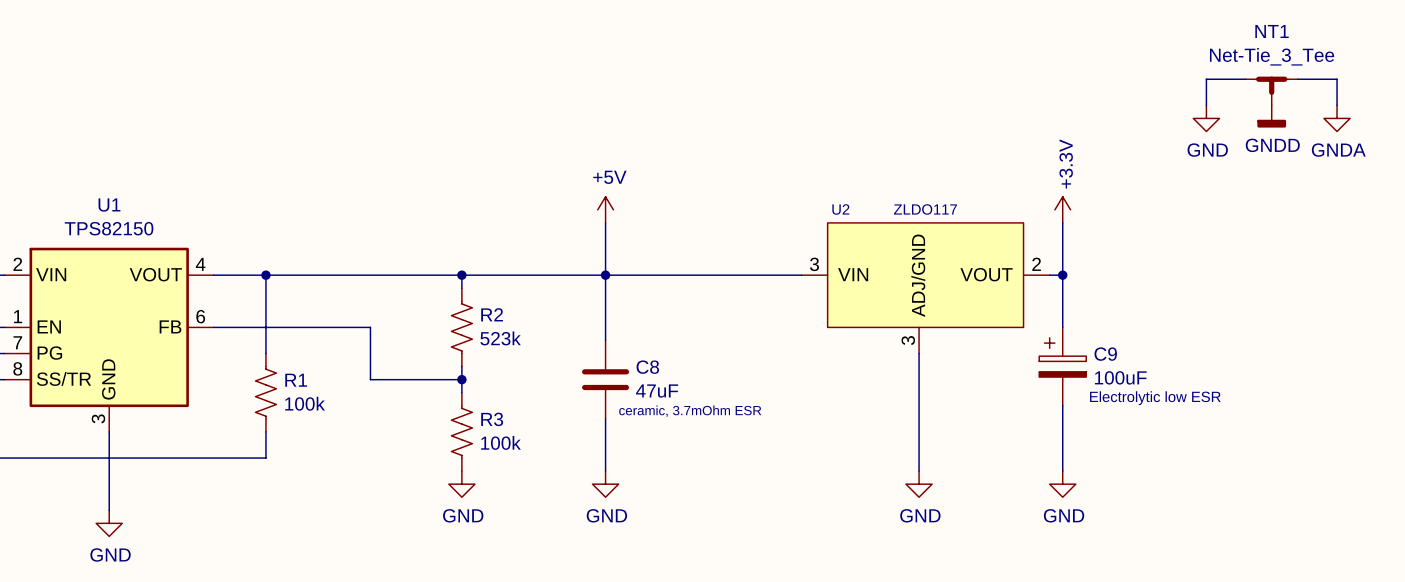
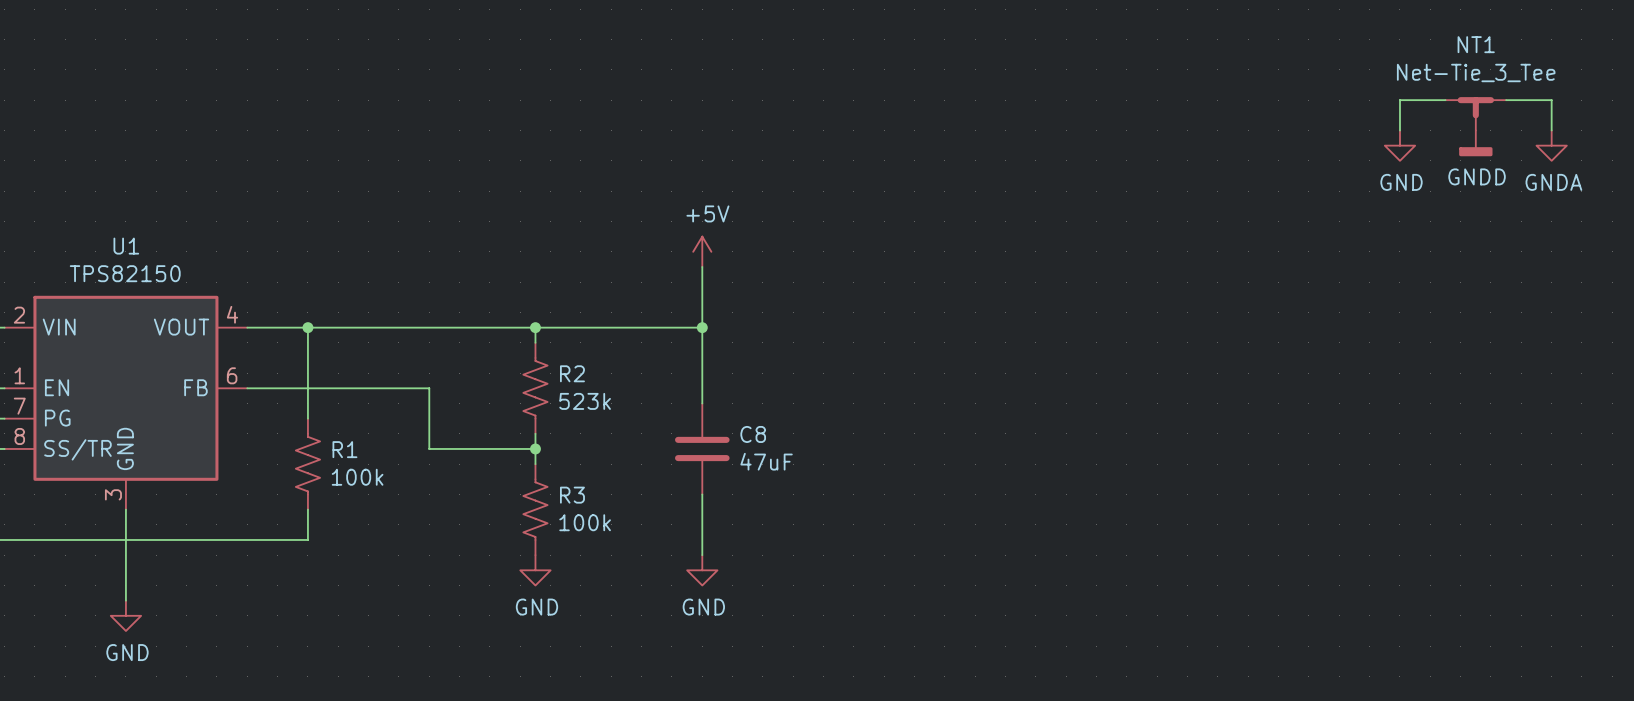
power symbol: +3.3V (1062, 209) -> none
wire: (1062, 222) (1062, 327) -> none
wire: (605, 275) (801, 275) -> none
wire: (1049, 275) (1062, 275) -> none
junction: (1062, 275) -> none
U2: ZLDO117 (925, 288) -> none
wire: (919, 353) (919, 471) -> none
C9: 100uF (1062, 366) -> none
text: Electrolytic low ESR (1155, 398) -> none
wire: (1062, 405) (1062, 471) -> none
text: ceramic, 3.7mOhm ESR (690, 411) -> none
power symbol: GND (919, 484) -> none
power symbol: GND (1062, 484) -> none

